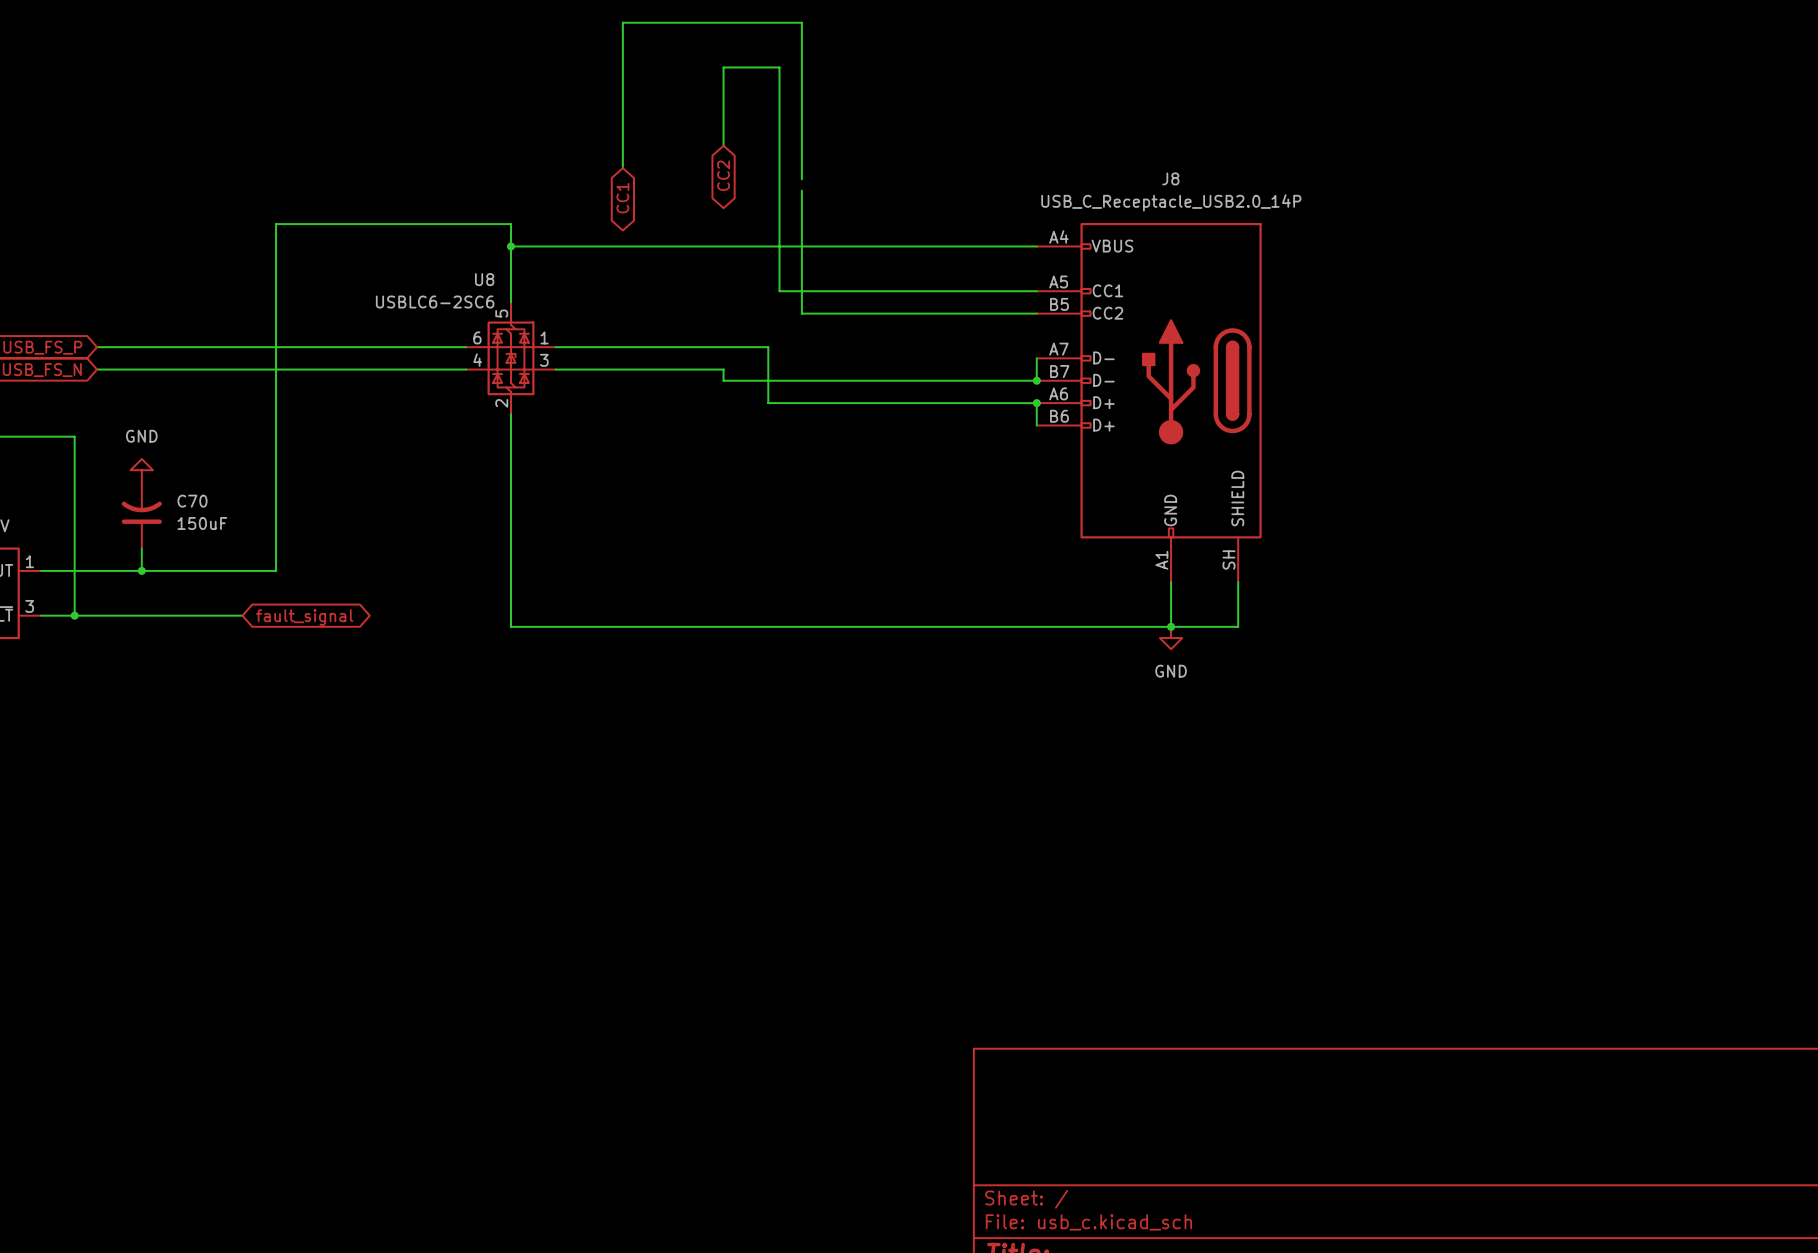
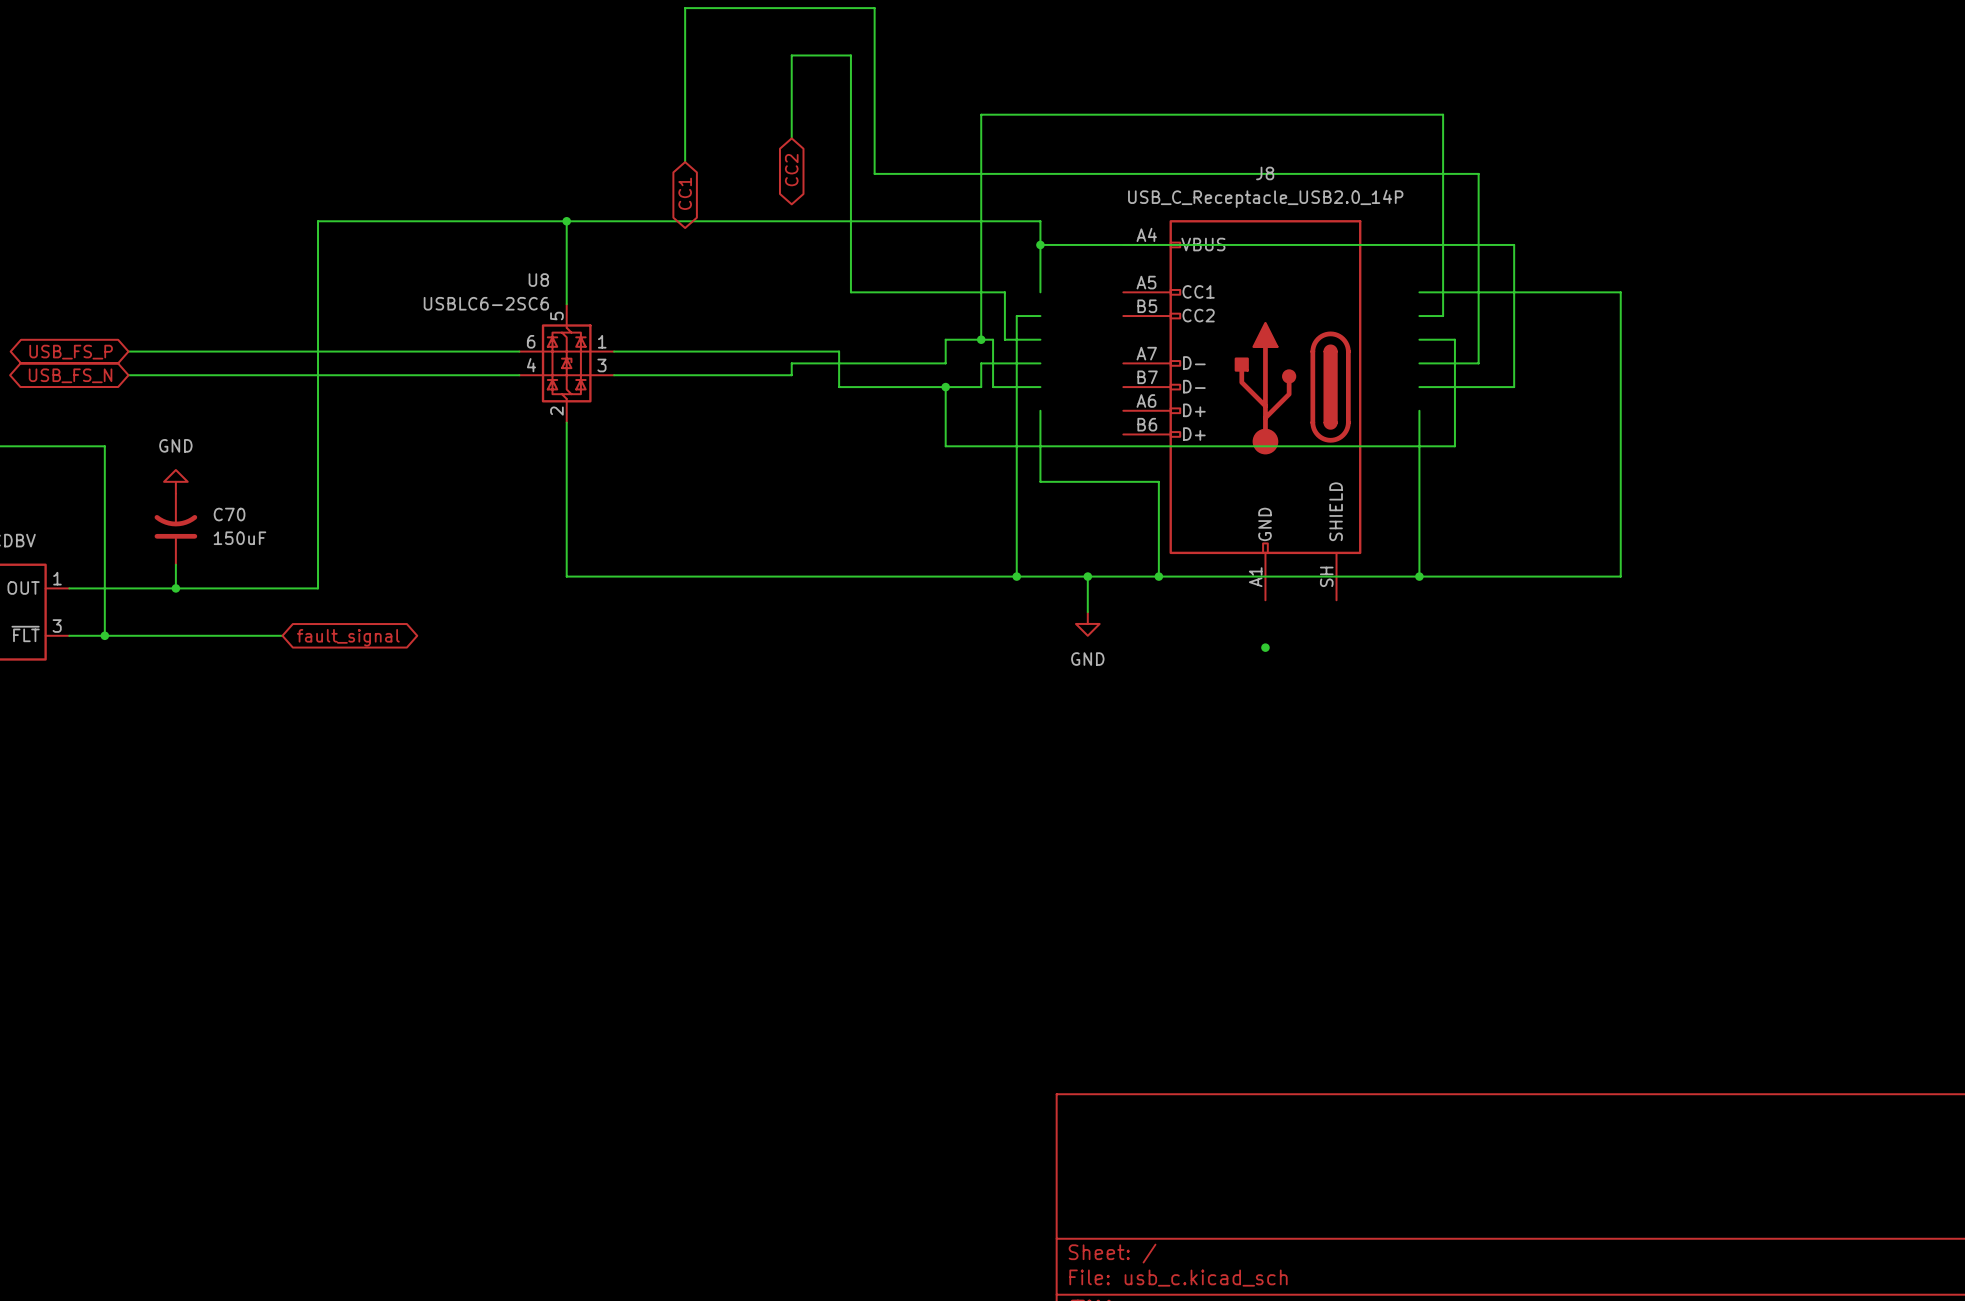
wire: none -> (874, 173) (1478, 173) (1478, 363) (1419, 363)
wire: (801, 190) (801, 313) (936, 313) -> (1016, 576) (1016, 316)
wire: none -> (566, 221) (1040, 221) (1040, 292)
wire: (510, 246) (958, 246) -> none
junction position: (510, 246) -> (566, 221)
junction: none -> (1040, 244)
wire: none -> (1123, 244) (1514, 244) (1514, 387) (1419, 387)
wire: (924, 291) (1036, 291) -> (1004, 292) (1004, 339) (1040, 339)
wire: (958, 313) (1036, 313) -> none
wire: none -> (1419, 316) (1443, 316) (1443, 114) (981, 114) (981, 339)
junction: none -> (981, 339)
wire: none -> (1419, 339) (1454, 339) (1454, 446) (945, 446) (945, 387)
wire: (1036, 358) (1036, 380) (958, 380) -> none
wire: (723, 369) (723, 380) (768, 380) (768, 403) (1036, 403) (1036, 425) -> (791, 375) (791, 363) (945, 363) (945, 339) (993, 339) (993, 387)
junction: none -> (945, 387)
wire: (902, 380) (913, 380) -> (981, 387) (981, 363) (1040, 363)
junction: (1036, 380) -> none
wire: none -> (1040, 410) (1040, 481) (1158, 481) (1158, 576)
junction: (1036, 403) -> none
wire: none -> (1419, 410) (1419, 576)
wire: (510, 559) (510, 626) (1238, 626) (1238, 582) -> (566, 576) (1620, 576) (1620, 292) (1419, 292)
junction: none -> (1016, 576)
wire: none -> (1087, 576) (1087, 612)
junction: none -> (1087, 576)
junction: none -> (1158, 576)
junction: none -> (1419, 576)
wire: (1171, 582) (1171, 626) -> none
power symbol position: GND (1171, 638) -> GND (1087, 623)

